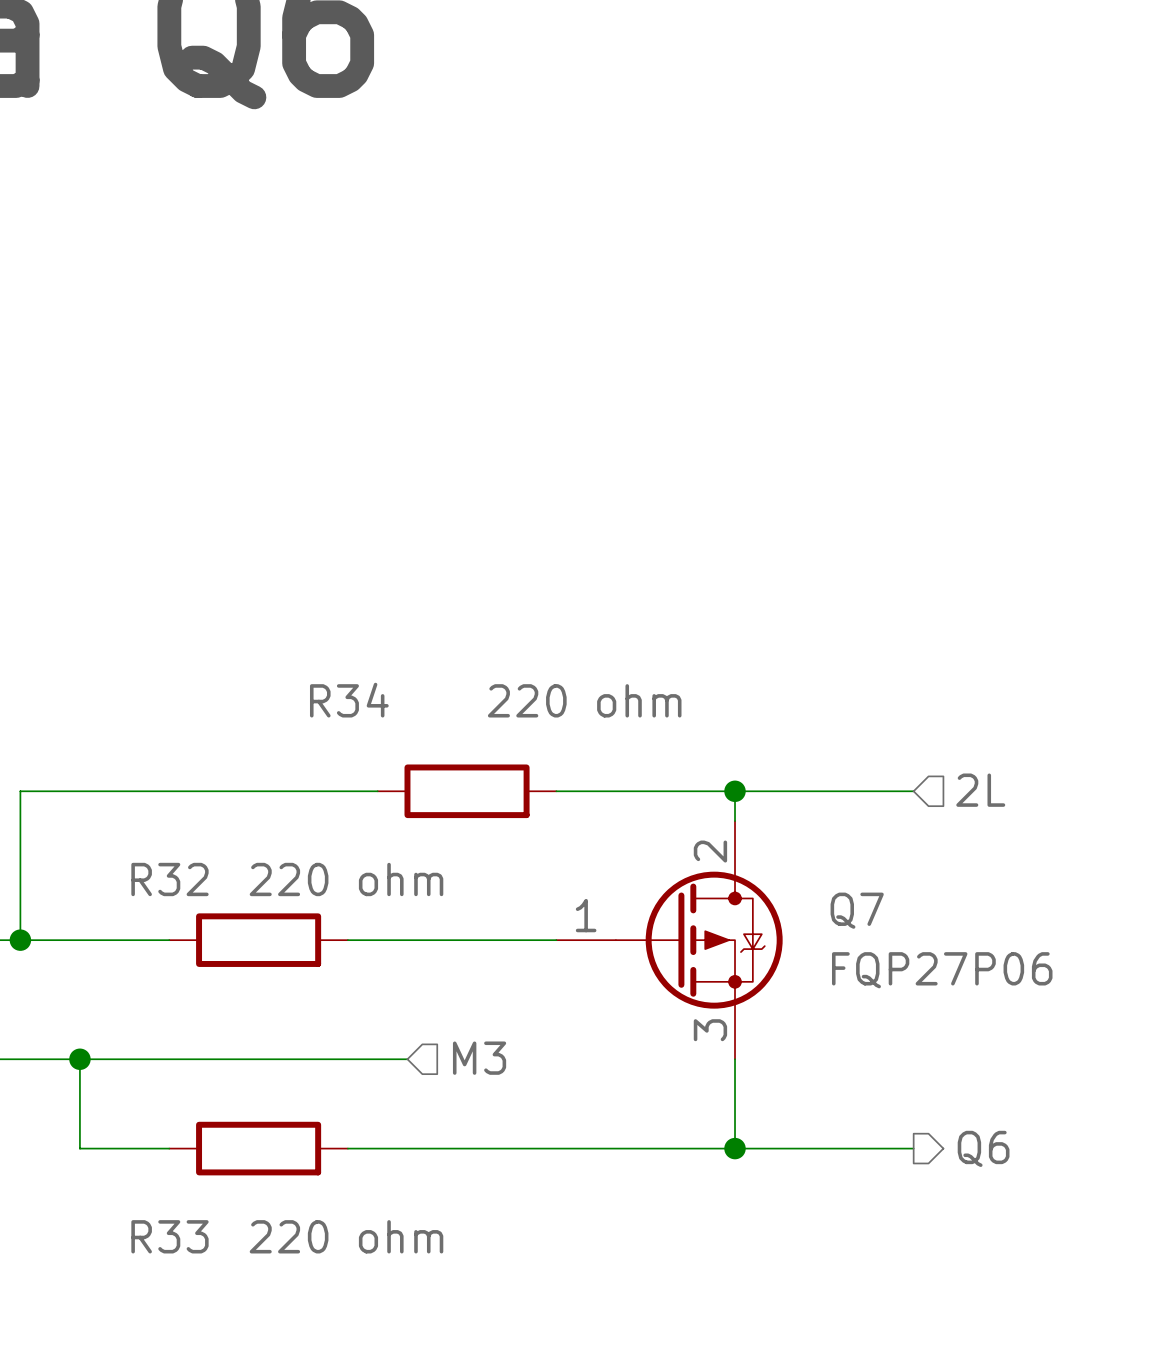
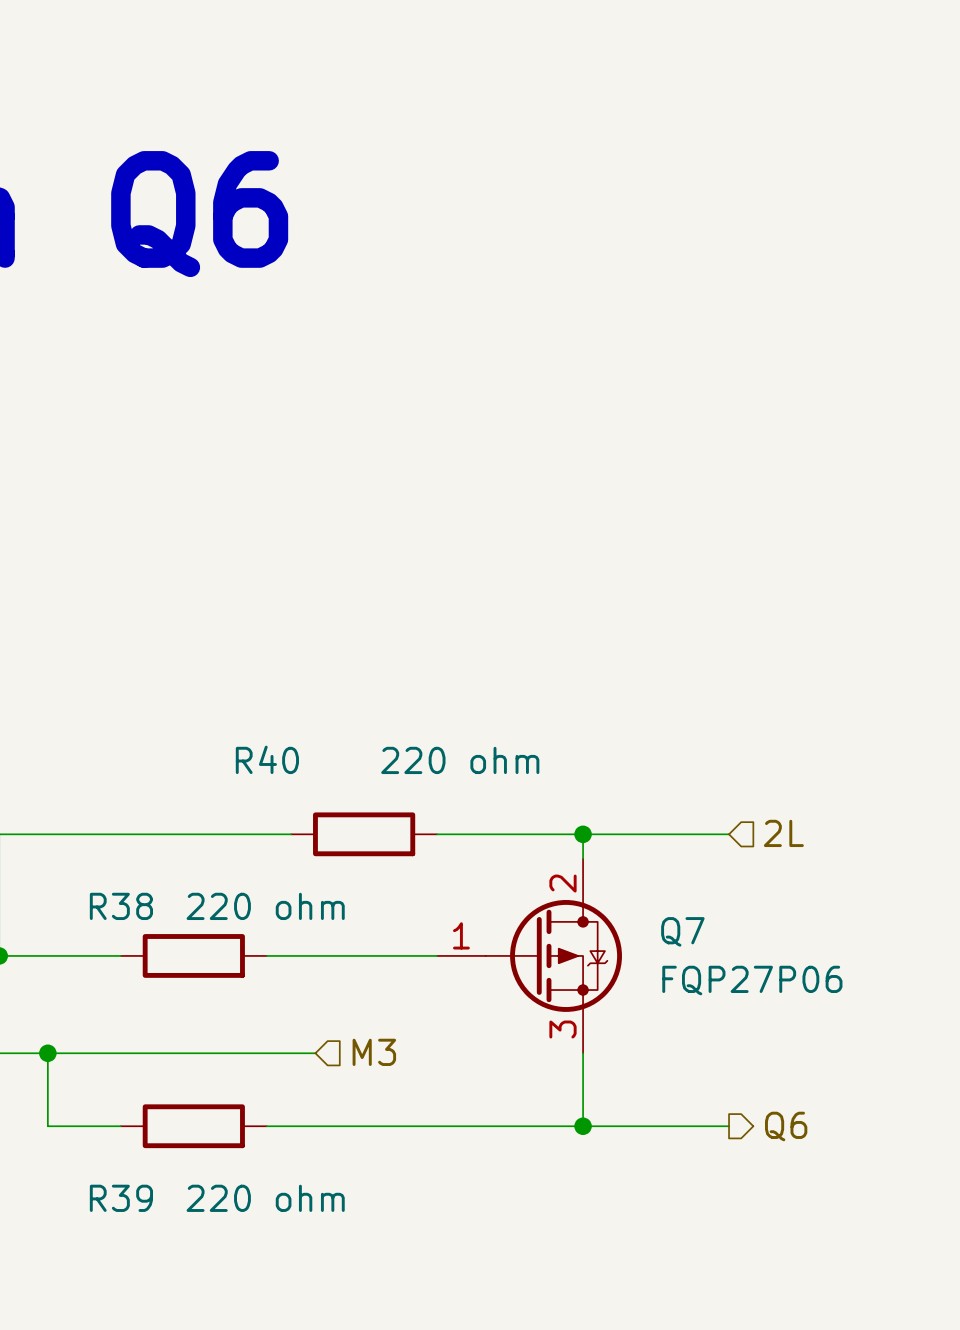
R34 name: R34 (349, 700) -> R40 (267, 759)
R32 name: R32 (169, 879) -> R38 (121, 906)
R33 name: R33 (169, 1236) -> R39 (121, 1198)

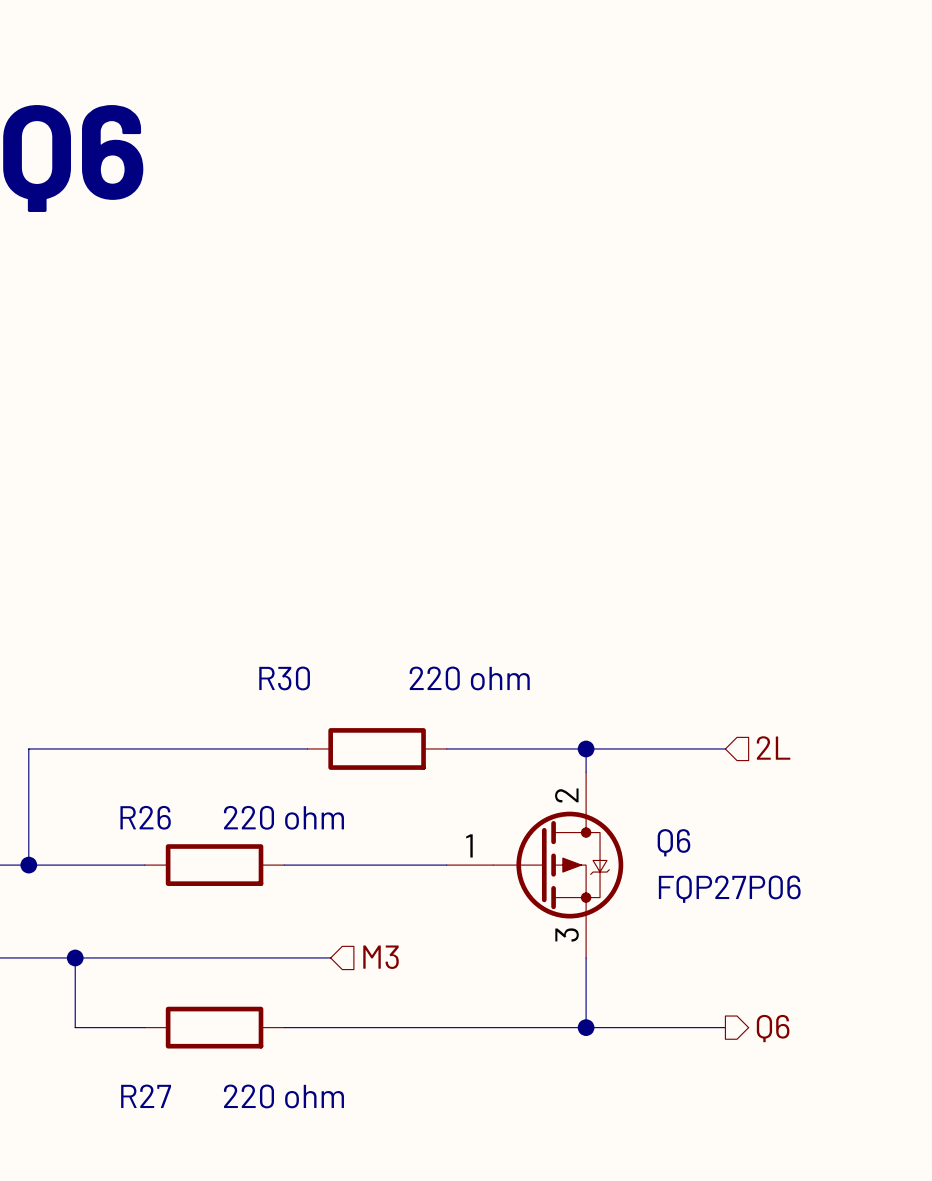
R40 name: R40 (267, 759) -> R30 (284, 678)
R38 name: R38 (121, 906) -> R26 (145, 817)
Q7 name: Q7 (682, 931) -> Q6 (673, 842)
R39 name: R39 (121, 1198) -> R27 (146, 1096)

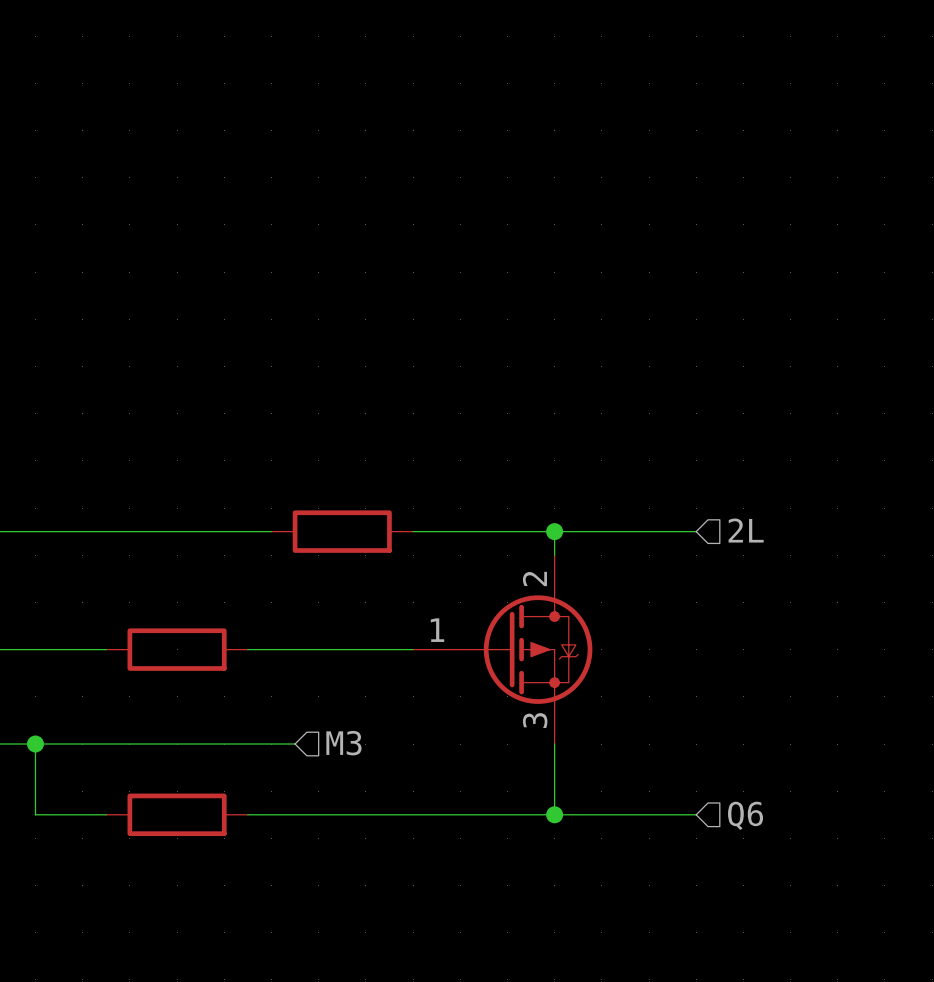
R30 name: R30 (284, 678) -> none
R30 value: 220 ohm (469, 678) -> none
R26 name: R26 (145, 817) -> none
R26 value: 220 ohm (283, 817) -> none
Q6 name: Q6 (673, 842) -> none
Q6 value: FQP27P06 (729, 889) -> none
hierarchical label shape: output (773, 1028) -> input (745, 815)
R27 name: R27 (146, 1096) -> none
R27 value: 220 ohm (283, 1096) -> none

